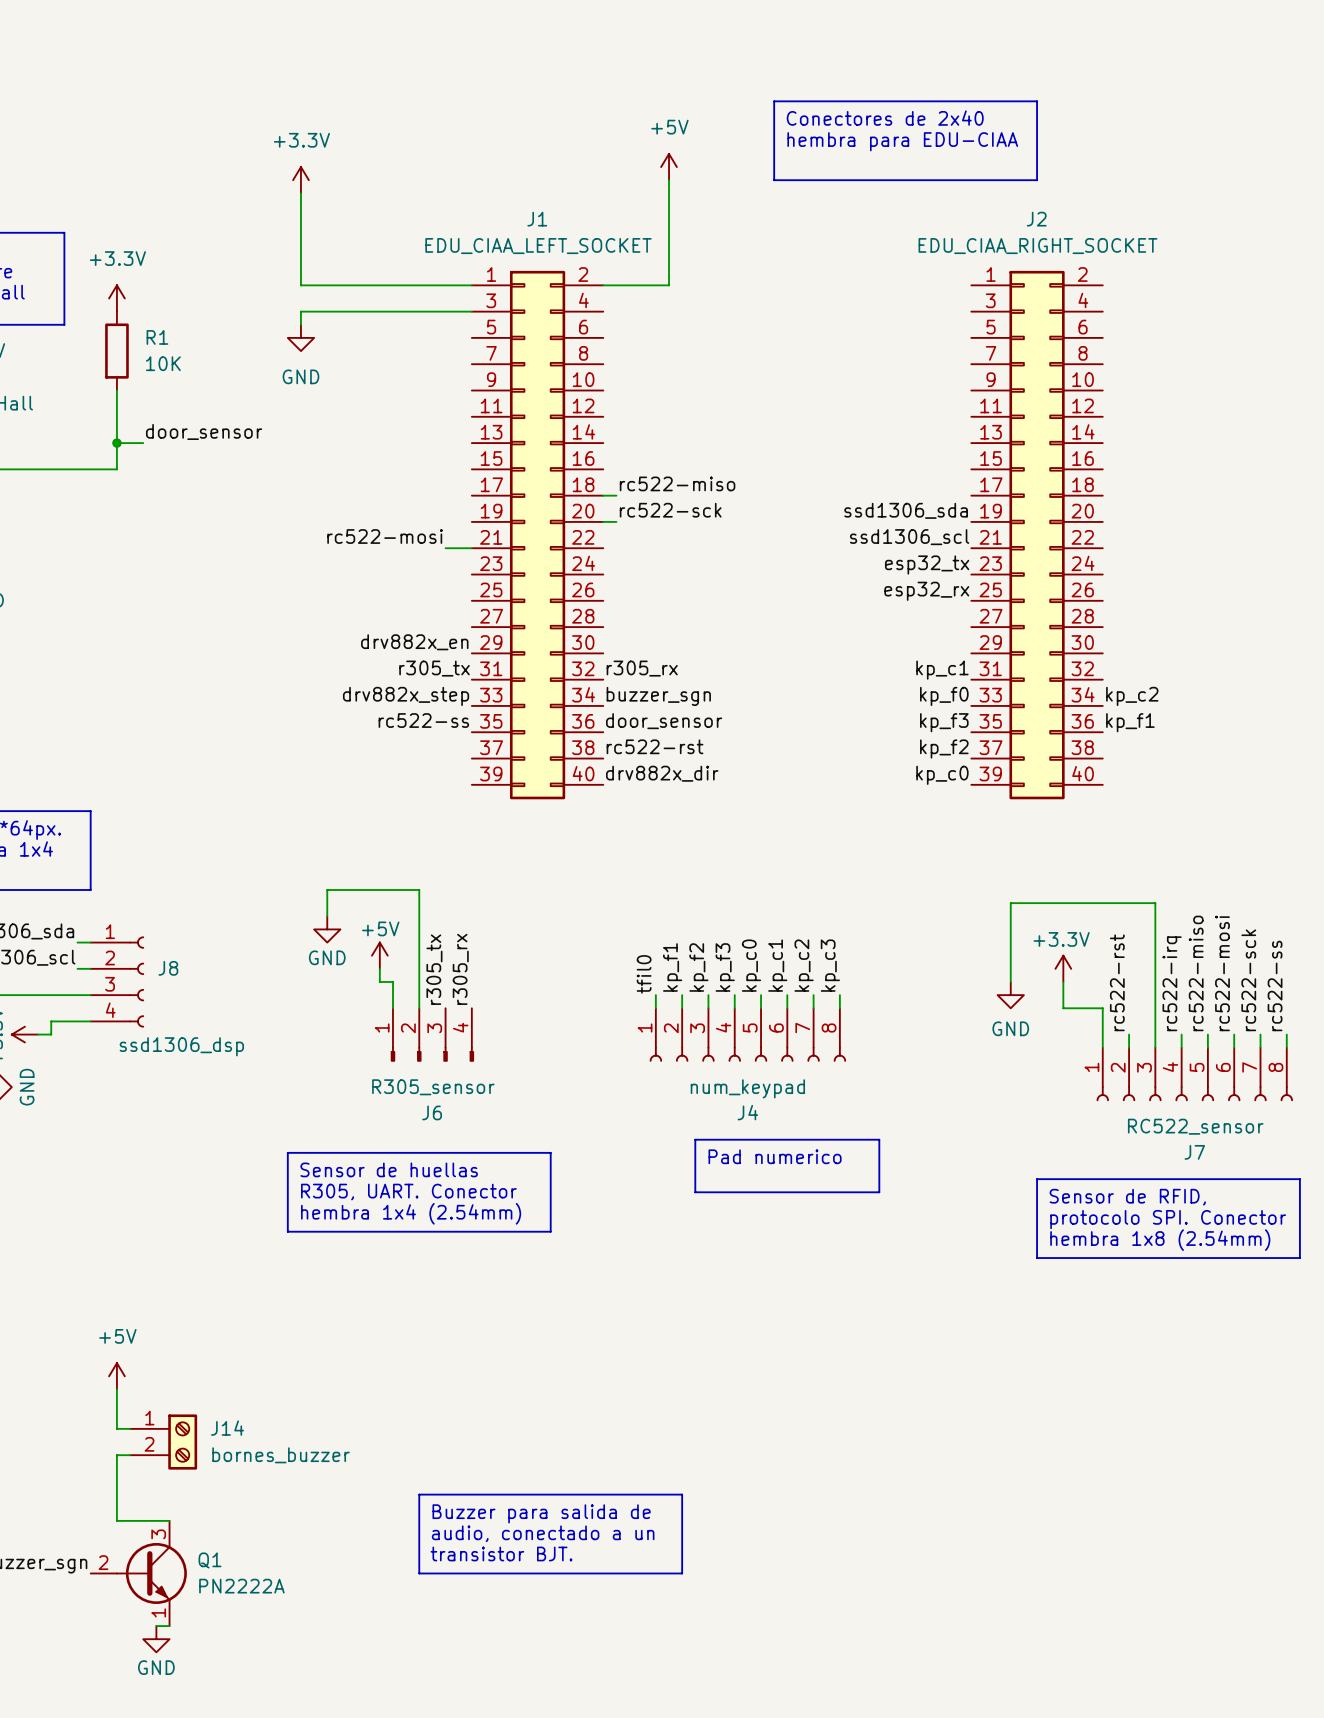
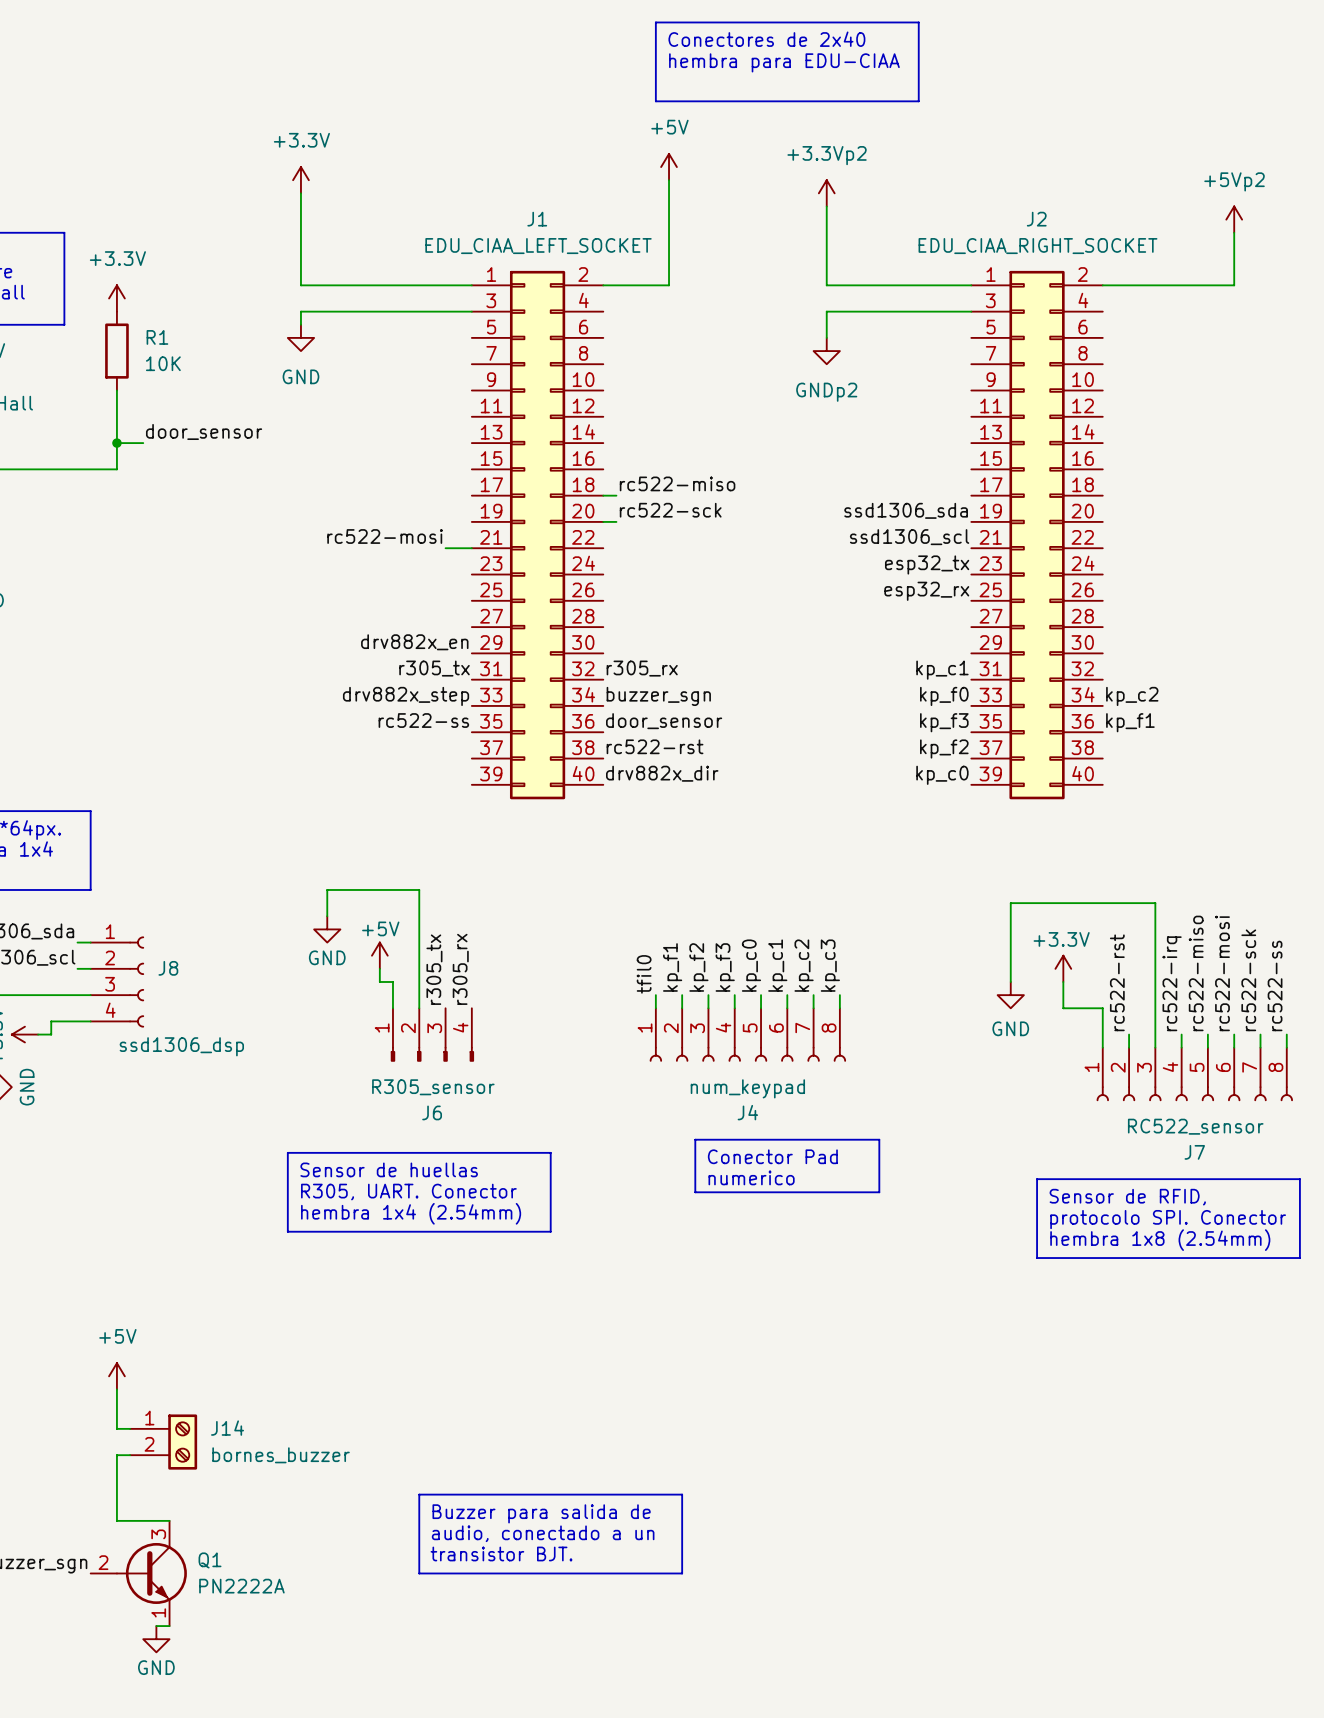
line: (774, 101) (774, 180) (1037, 180) (1037, 101) (918, 101) -> (774, 101) (655, 101) (655, 22) (918, 22) (918, 101)
text position: Conectores de 2x40 (885, 118) -> Conectores de 2x40 (766, 39)
text position: hembra para EDU-CIAA (902, 141) -> hembra para EDU-CIAA (784, 62)
power symbol: none -> +3.3Vp2 (826, 193)
wire: none -> (826, 206) (826, 285) (971, 285)
power symbol: none -> +5Vp2 (1234, 219)
wire: none -> (1234, 232) (1234, 285) (1102, 285)
wire: none -> (971, 311) (826, 311) (826, 337)
power symbol: none -> GNDp2 (826, 351)
text: Pad numerico (775, 1156) -> Conector Pad (772, 1156)
text: none -> numerico (751, 1177)

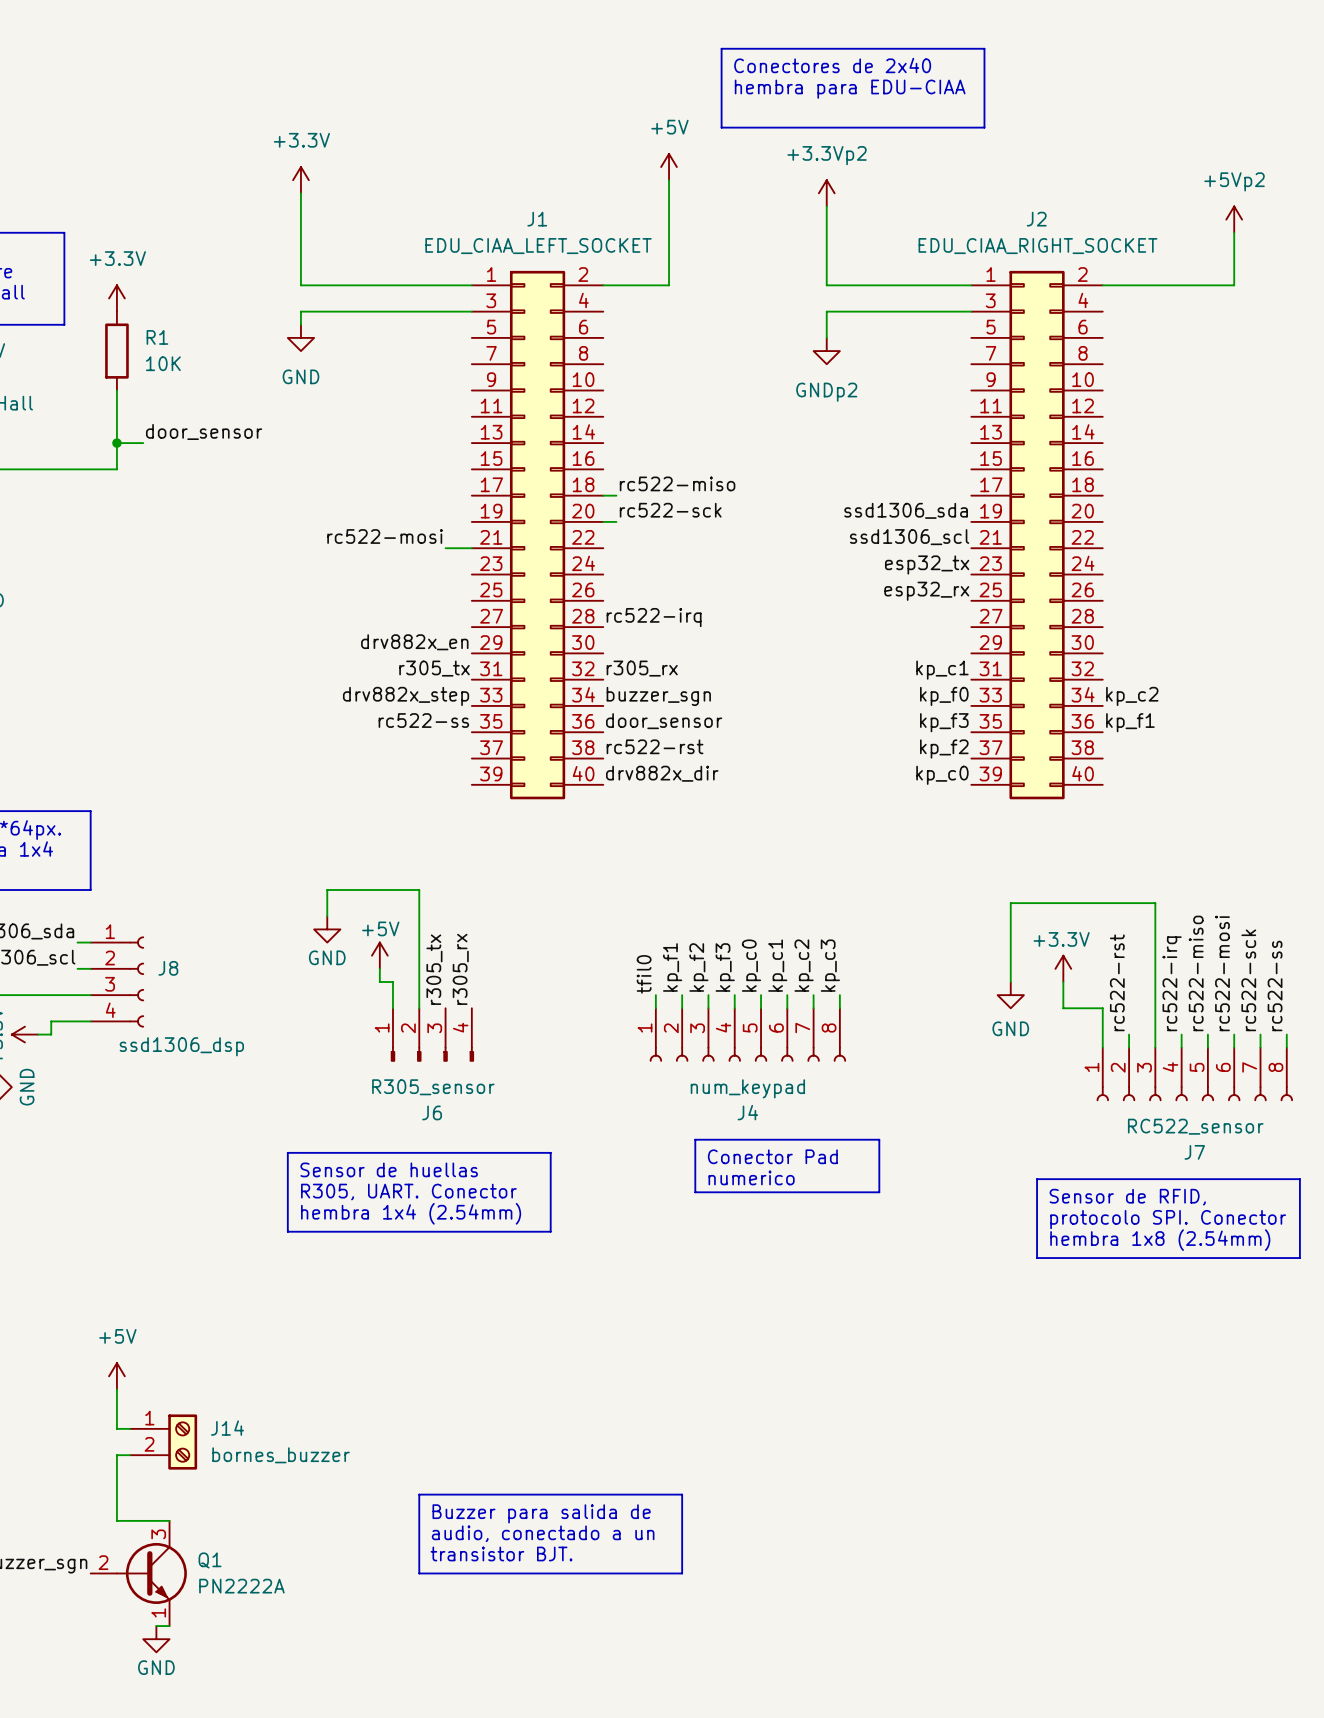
line: (655, 22) (918, 22) (918, 101) (655, 101) (655, 22) -> (721, 48) (984, 48) (984, 127) (721, 127) (721, 48)
text position: Conectores de 2x40 (766, 39) -> Conectores de 2x40 (832, 65)
text position: hembra para EDU-CIAA (784, 62) -> hembra para EDU-CIAA (850, 89)
label: none -> rc522-irq (654, 617)

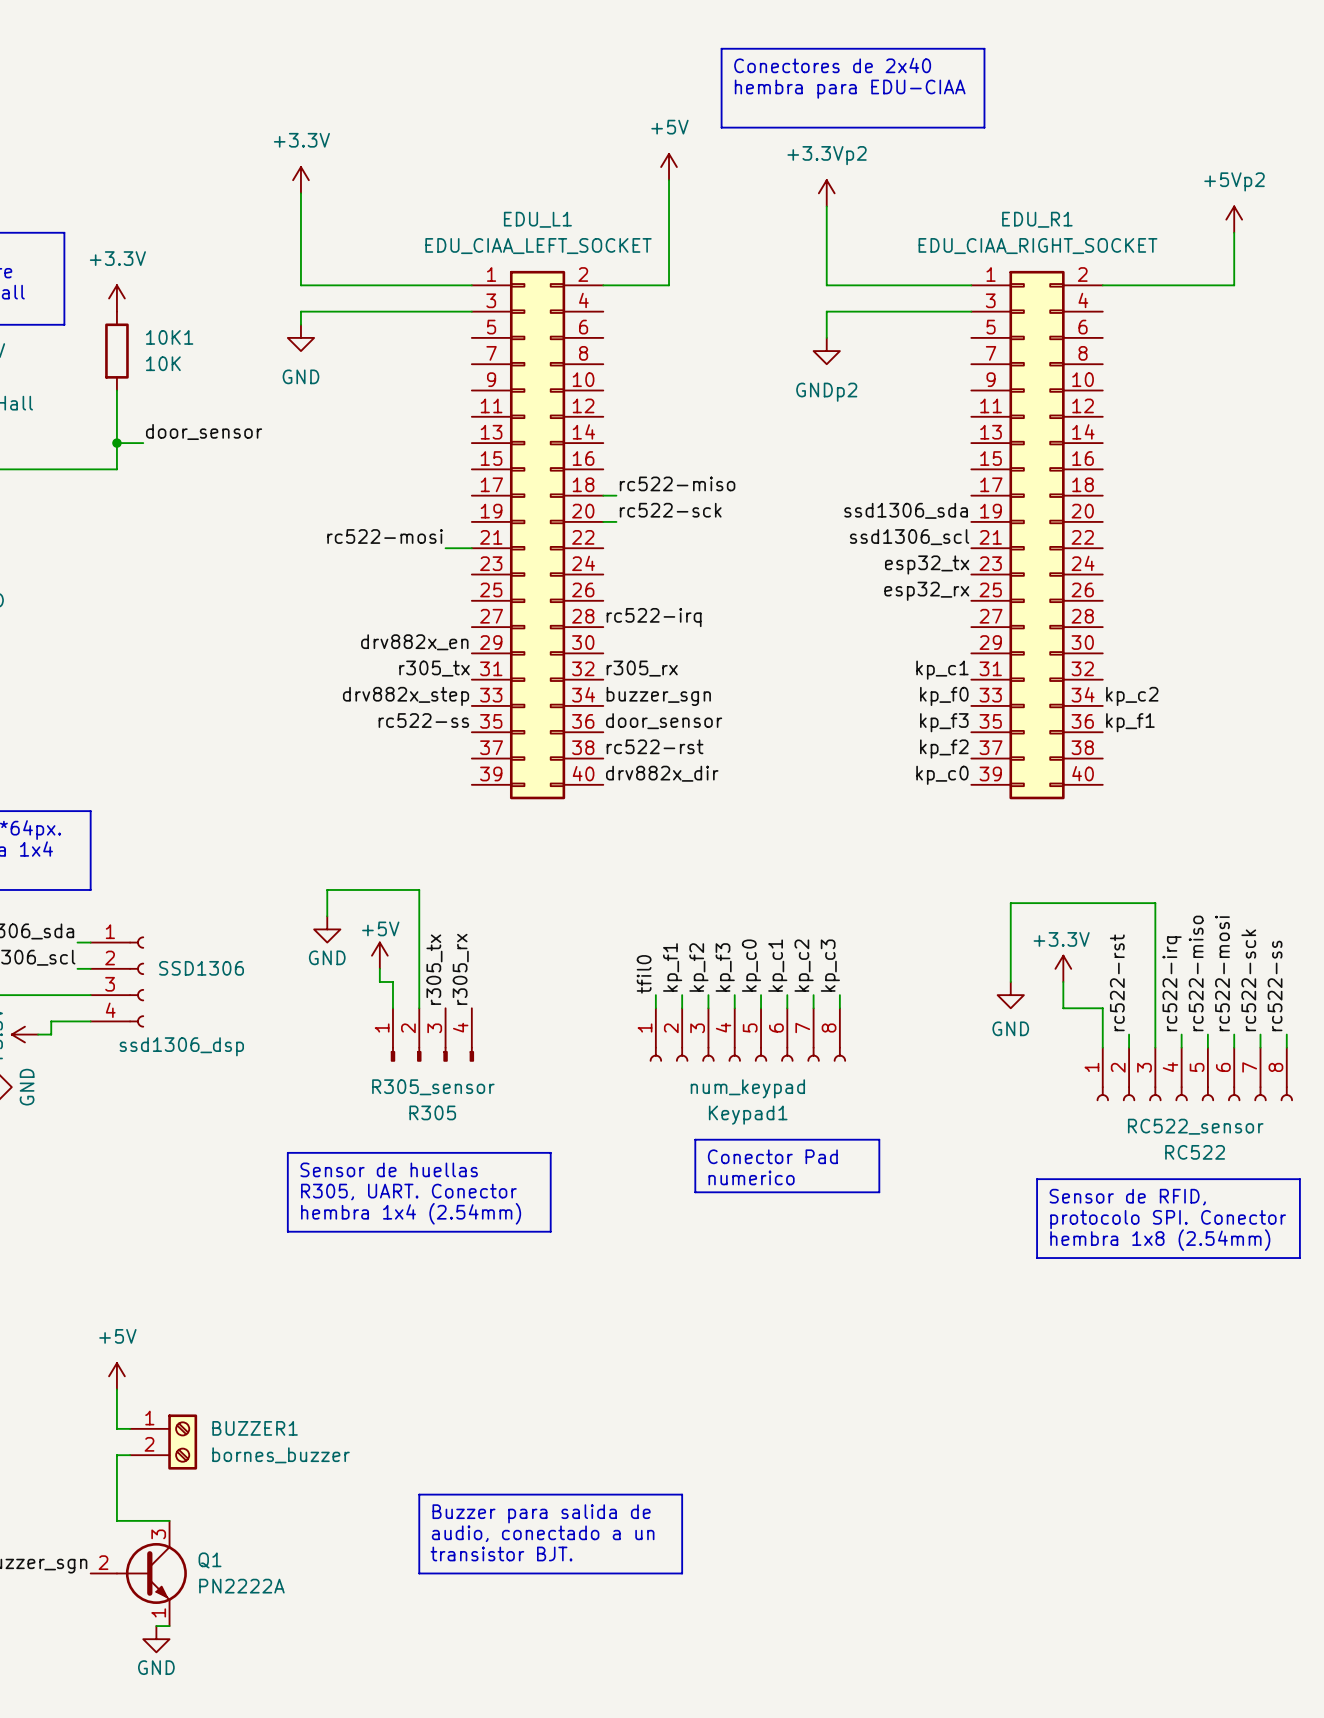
J1 name: J1 (537, 219) -> EDU_L1 (537, 219)
J2 name: J2 (1036, 219) -> EDU_R1 (1037, 219)
R1 name: R1 (157, 337) -> 10K1 (169, 337)
J8 name: J8 (168, 968) -> SSD1306 (201, 968)
J6 name: J6 (432, 1112) -> R305 (432, 1112)
J4 name: J4 (747, 1112) -> Keypad1 (748, 1115)
J7 name: J7 (1194, 1152) -> RC522 (1195, 1152)
J14 name: J14 (227, 1428) -> BUZZER1 (255, 1428)

